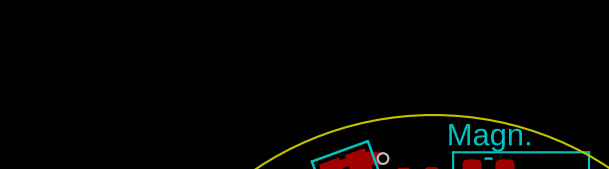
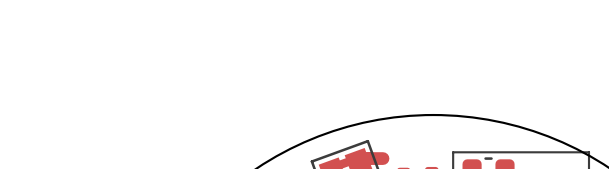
text: Magn. (489, 137) -> none
via: (383, 158) -> none

